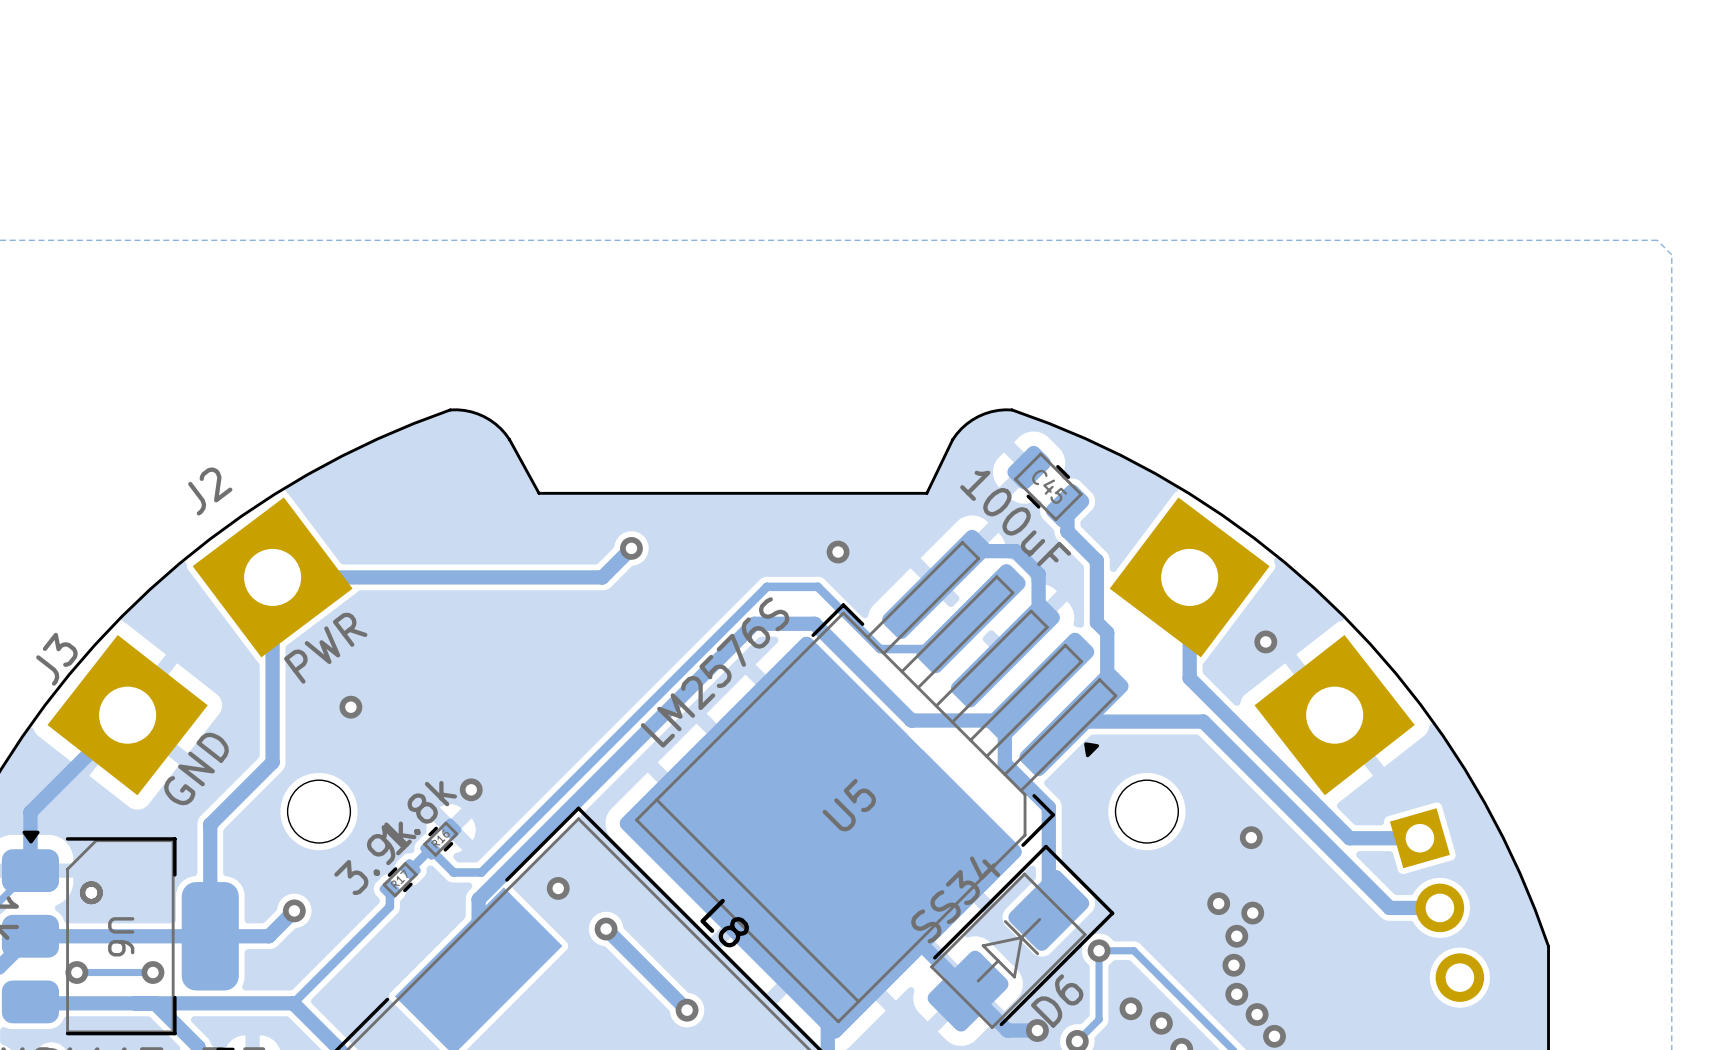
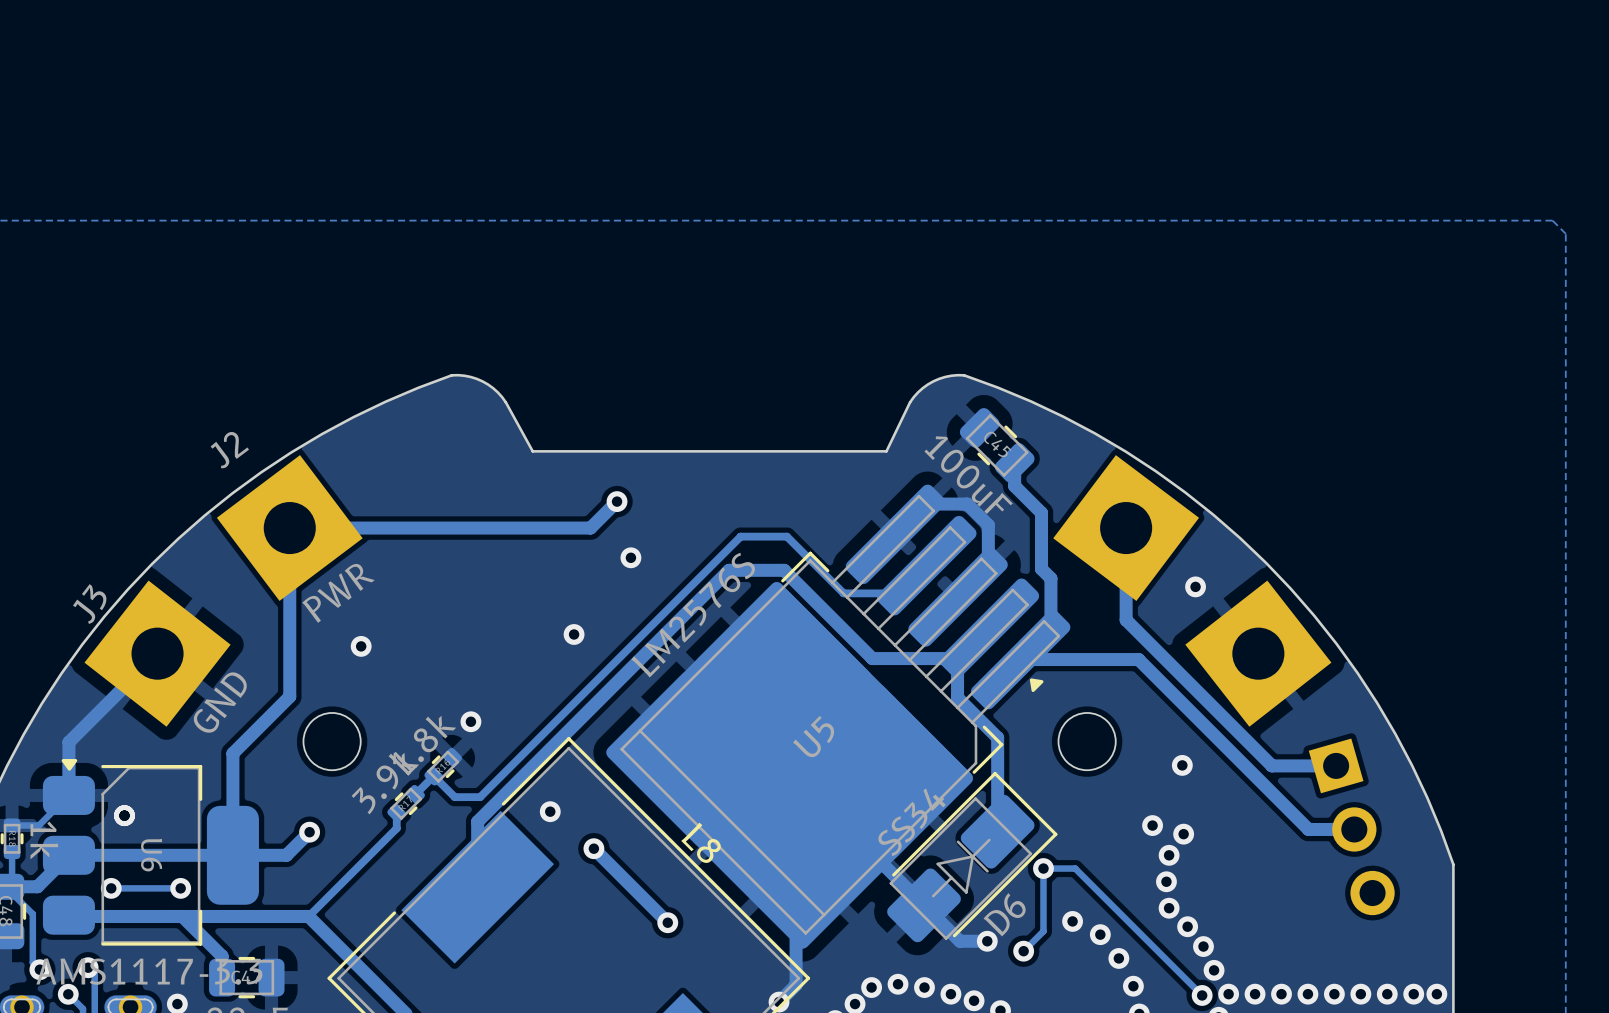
via: (838, 552) -> none
via: none -> (630, 557)
via: none -> (574, 634)

